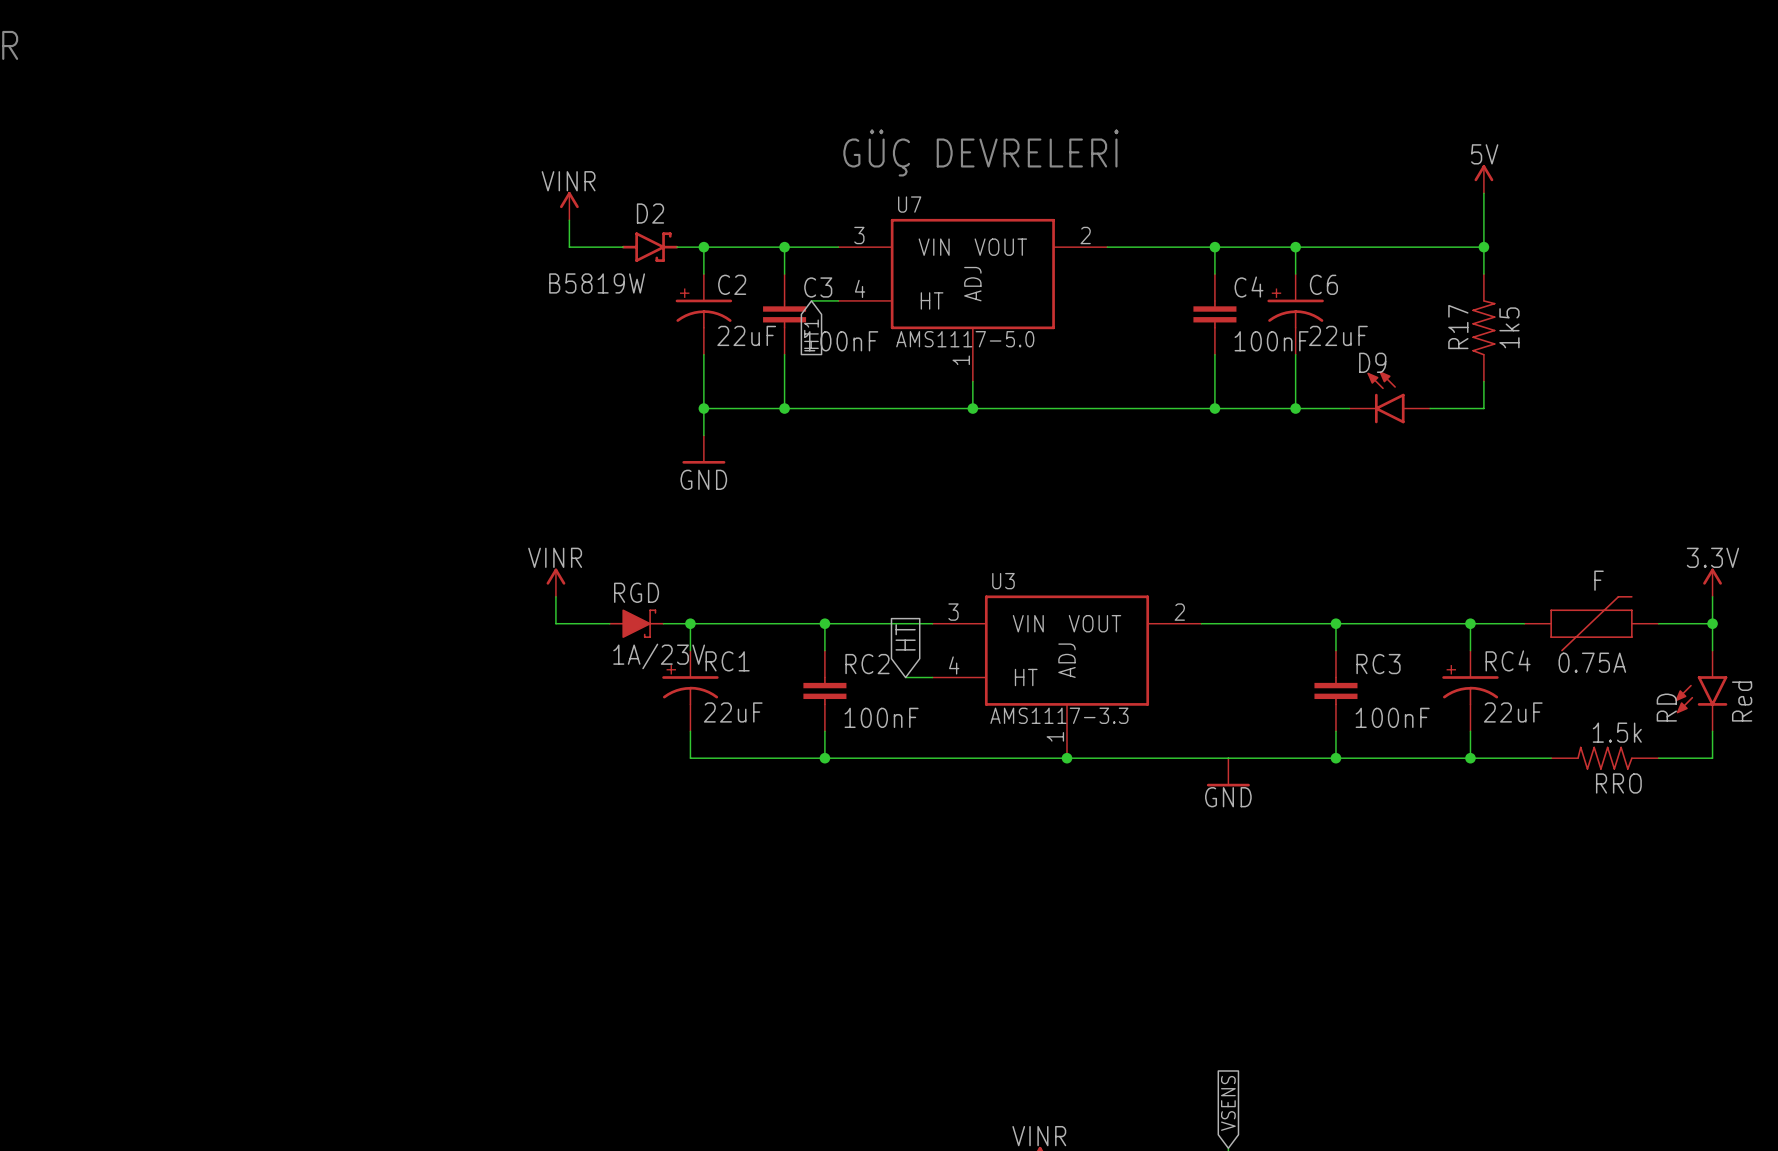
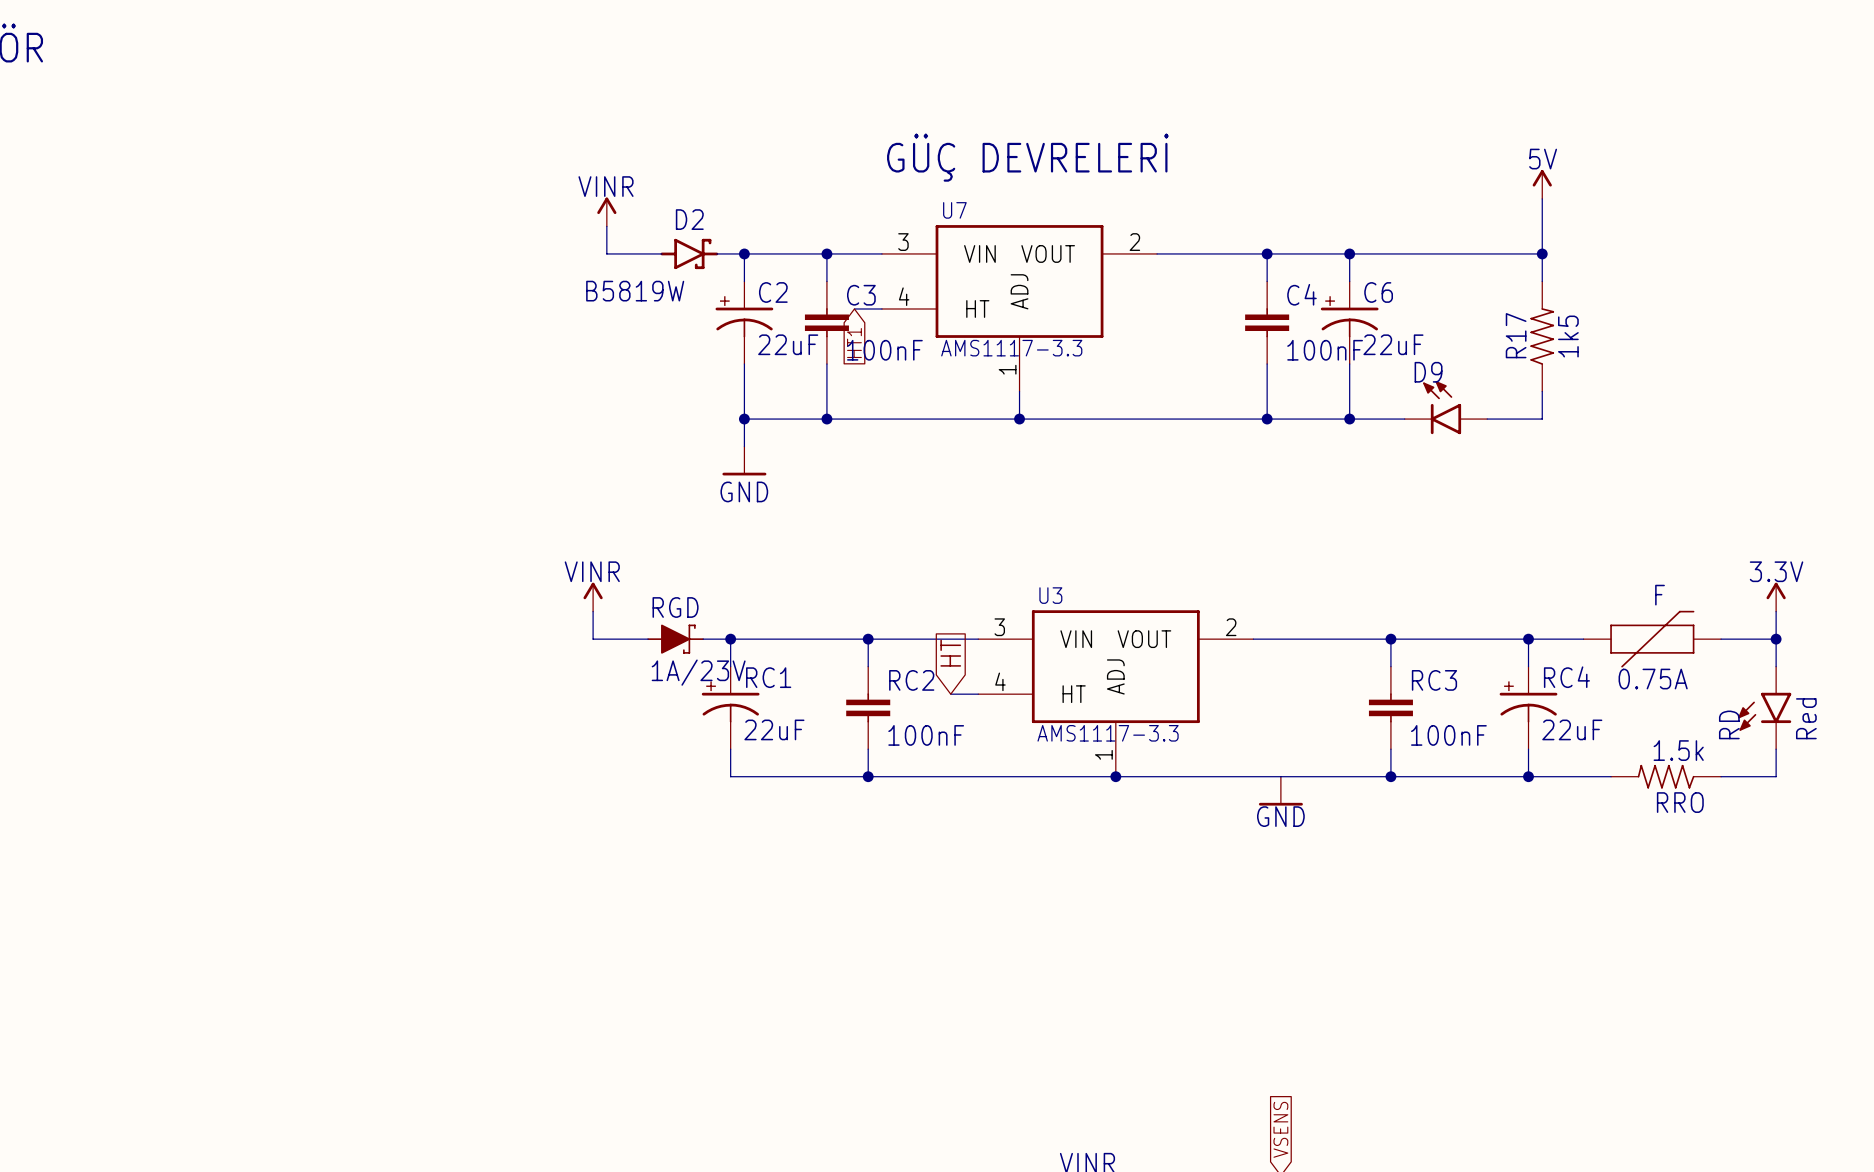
U7 value: AMS1117-5.0 (965, 339) -> AMS1117-3.3 (1011, 348)

